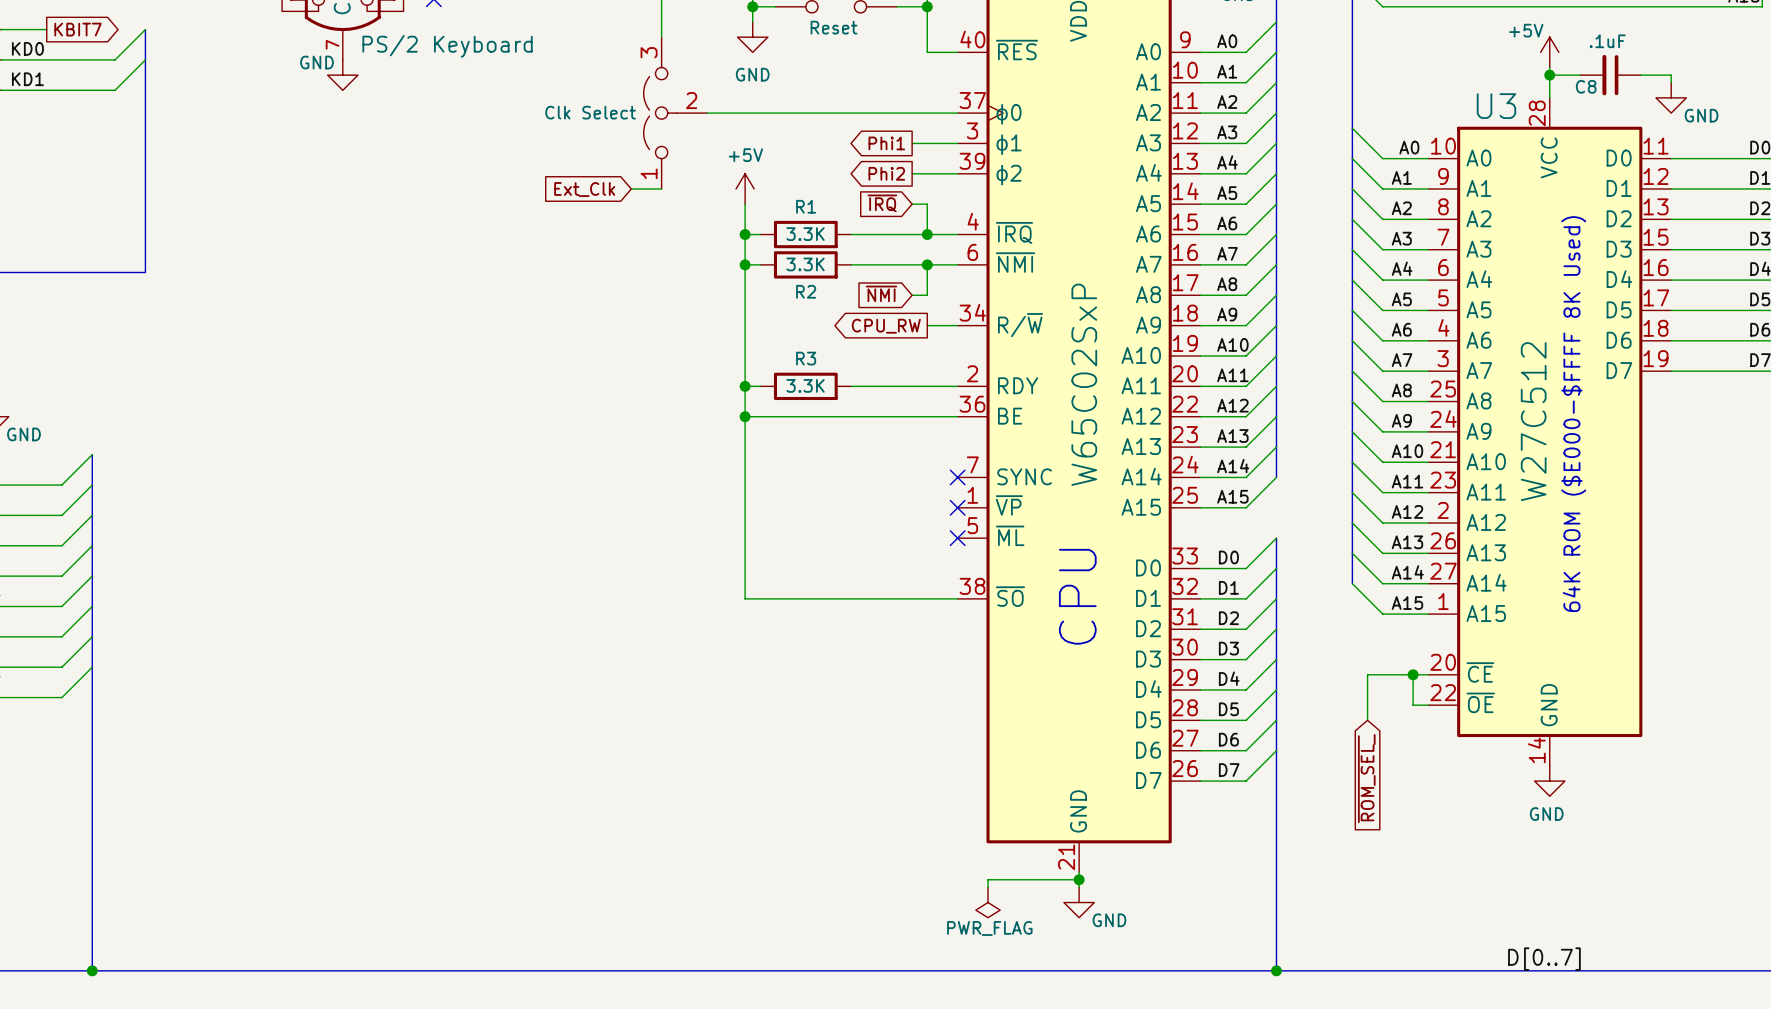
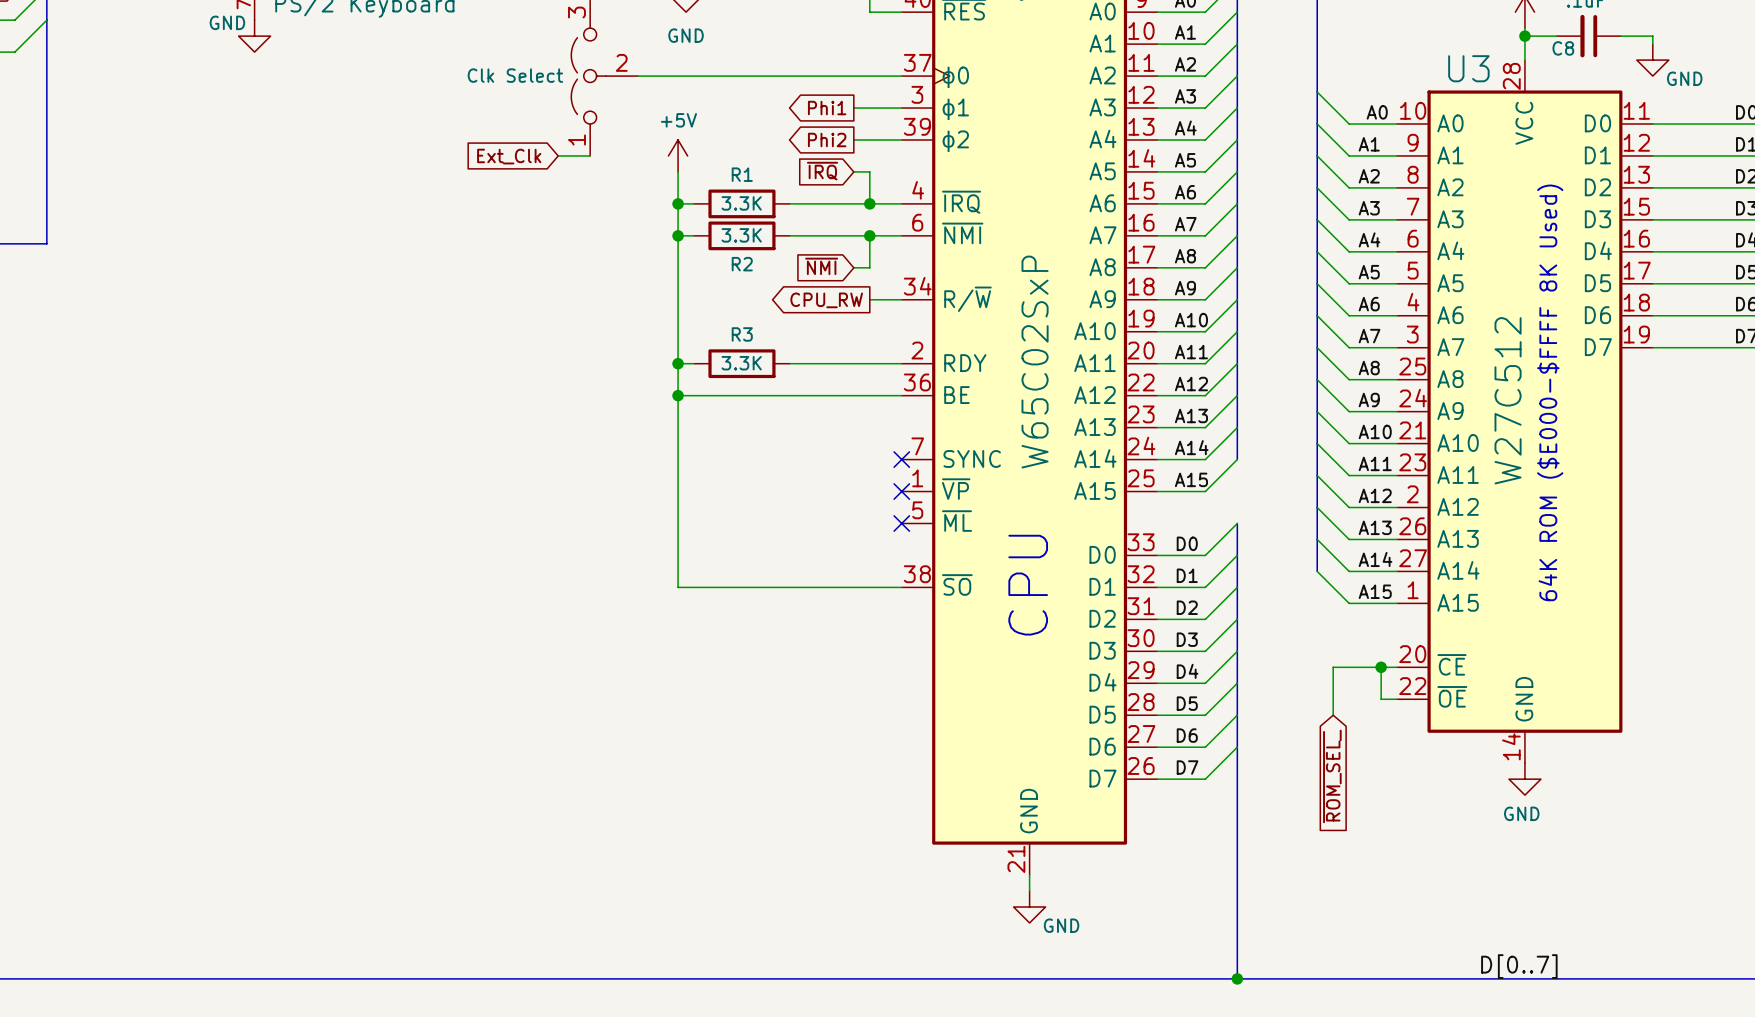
wire: (1079, 879) (988, 879) (988, 887) -> none
junction: (1079, 879) -> none
power symbol: PWR_FLAG (988, 902) -> none

